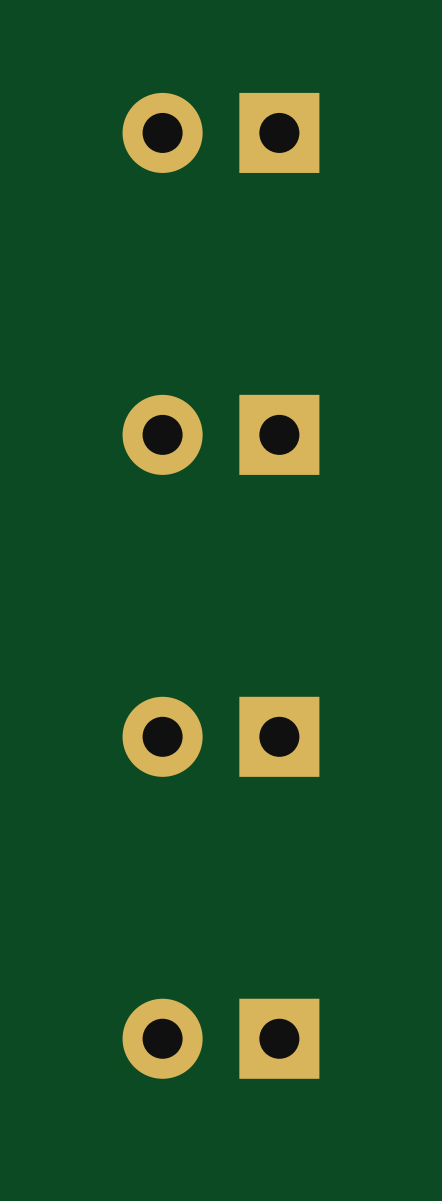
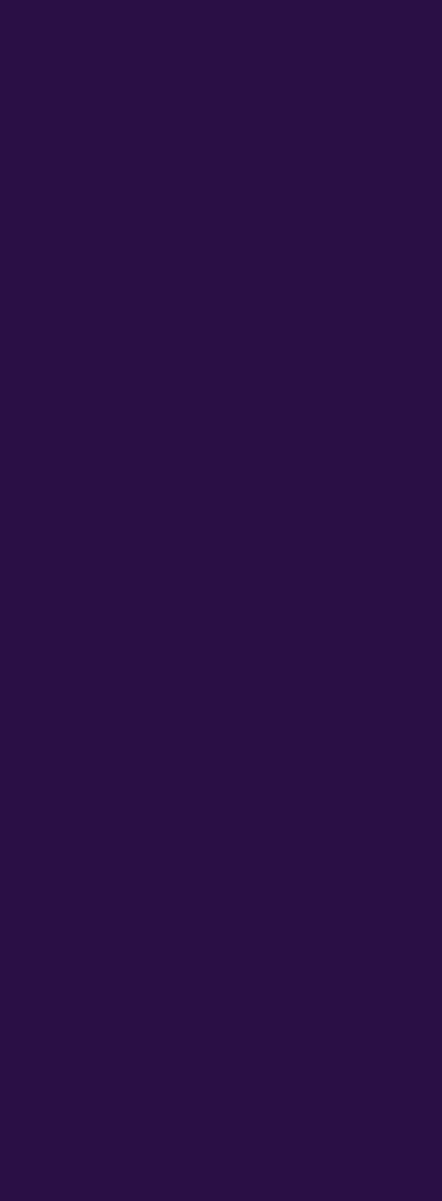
part: (220, 132) -> none
part: (220, 434) -> none
part: (220, 736) -> none
part: (220, 1038) -> none

